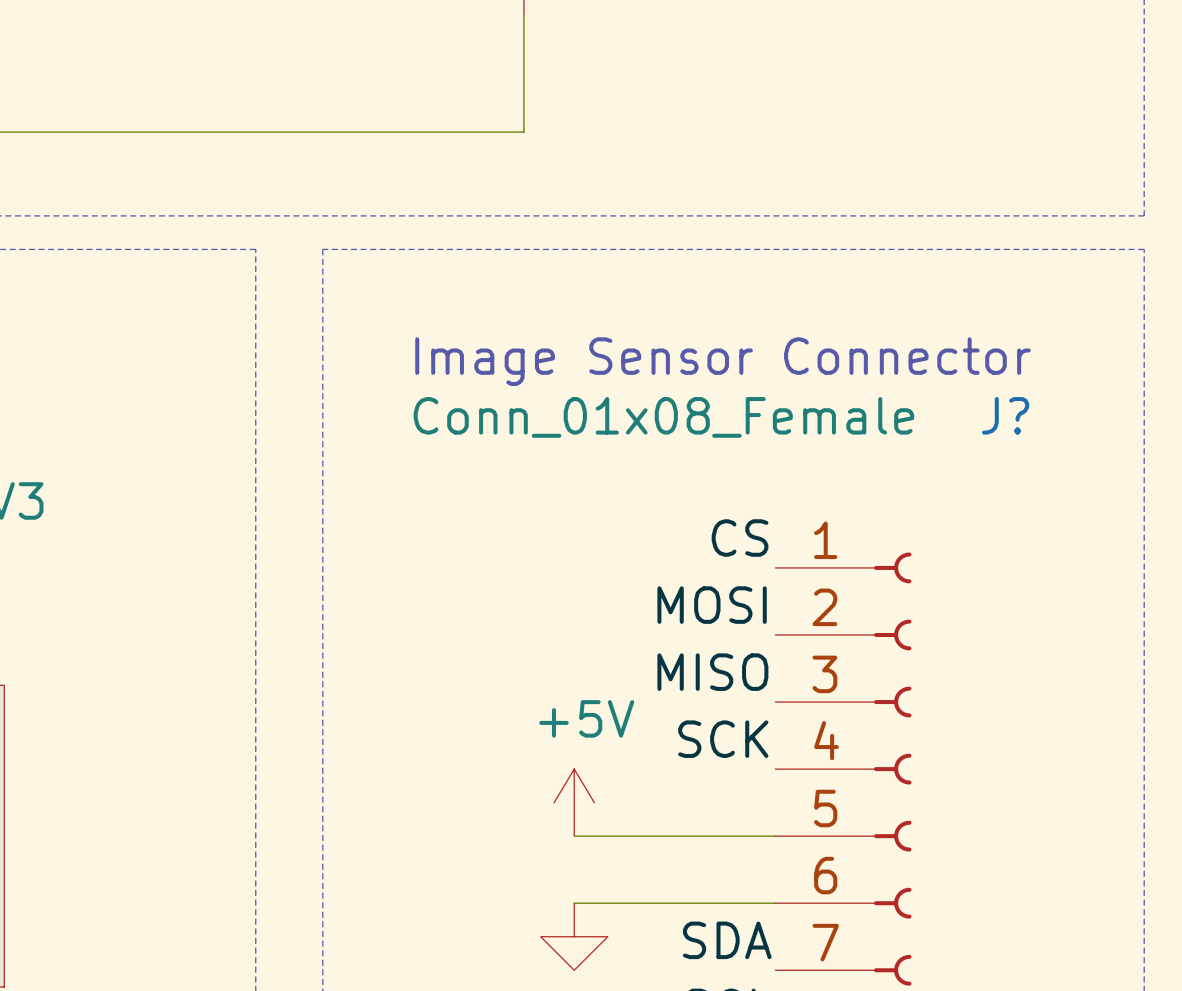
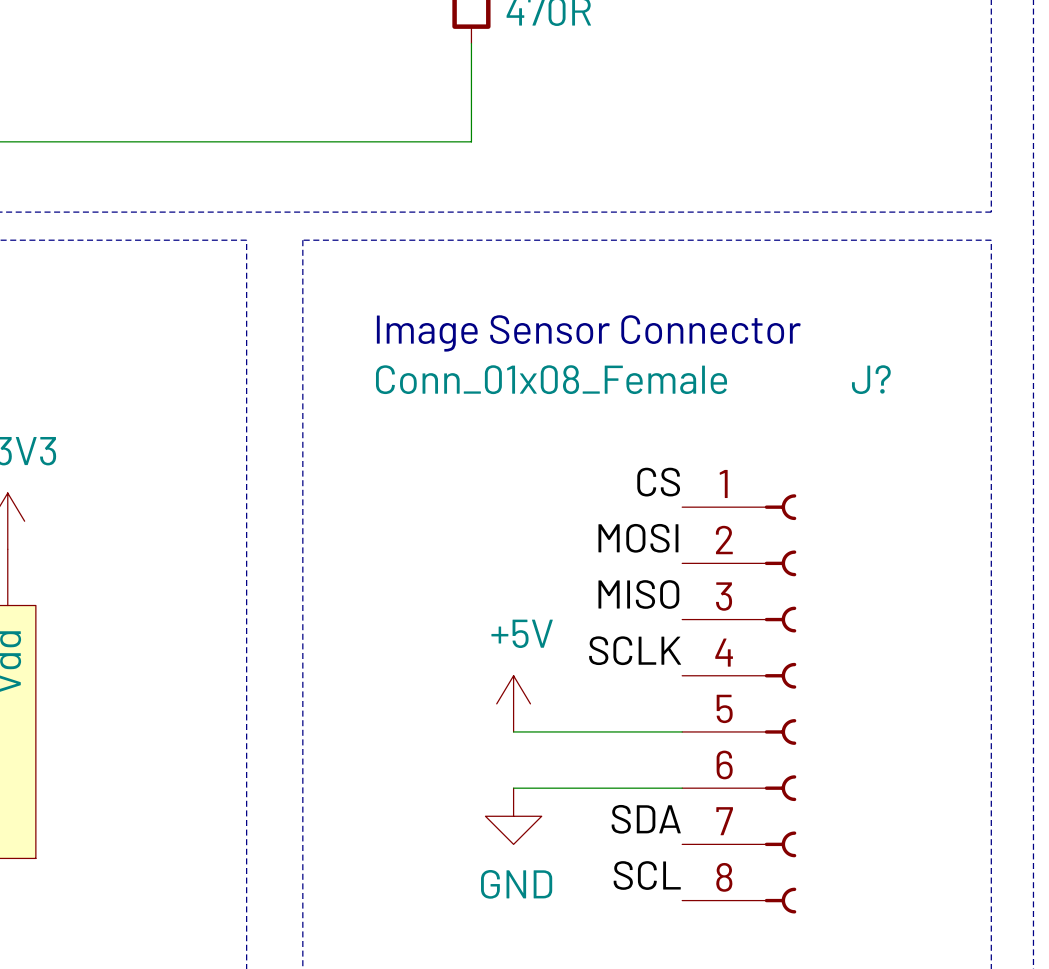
label: SCK (723, 739) -> SCLK (635, 650)

